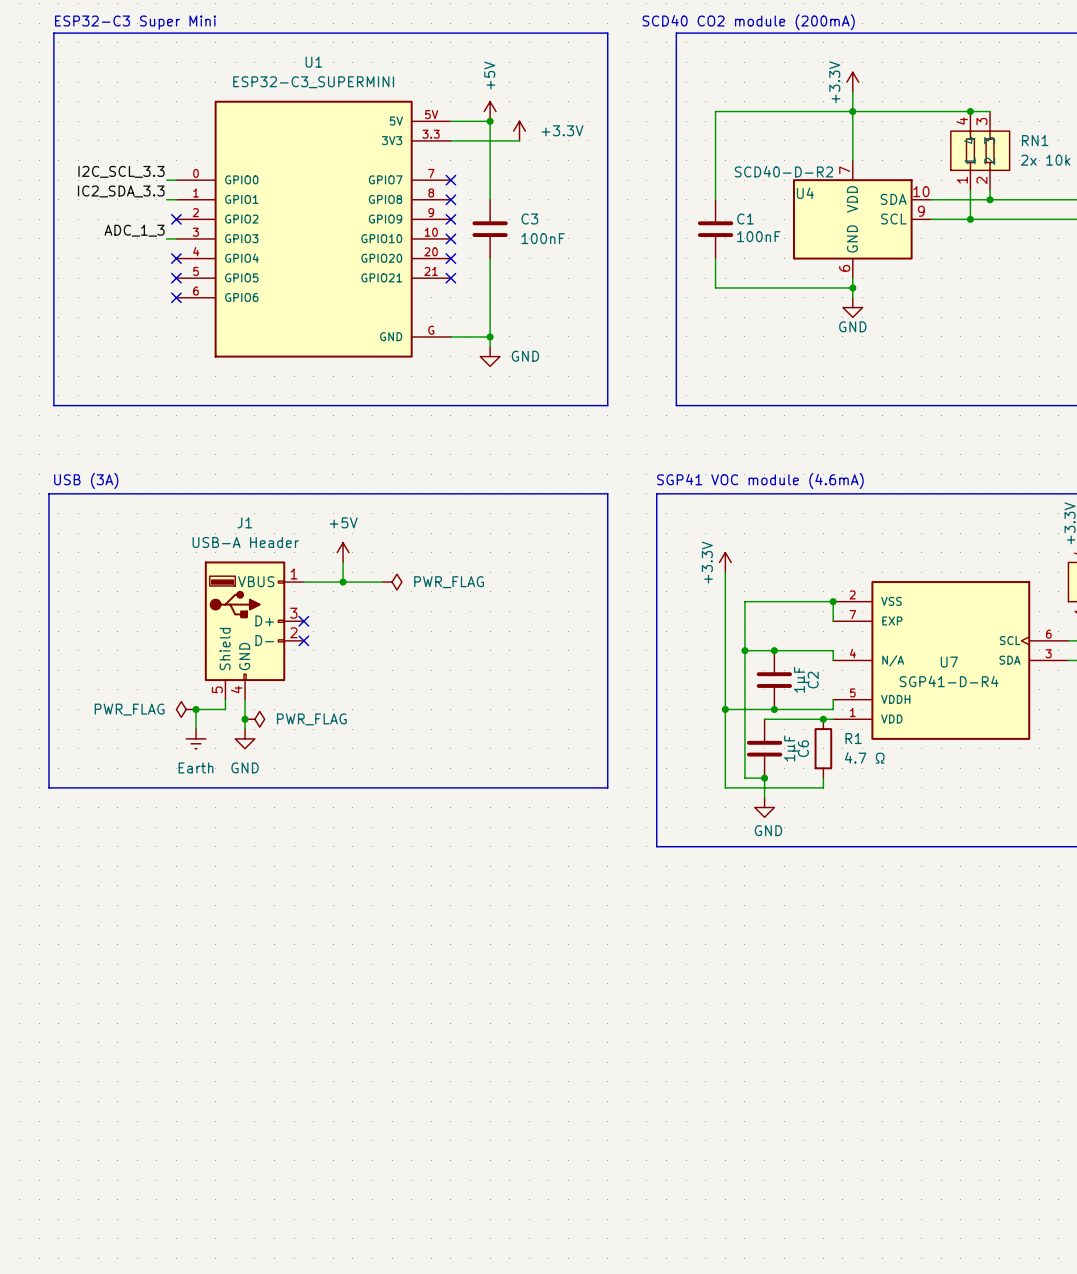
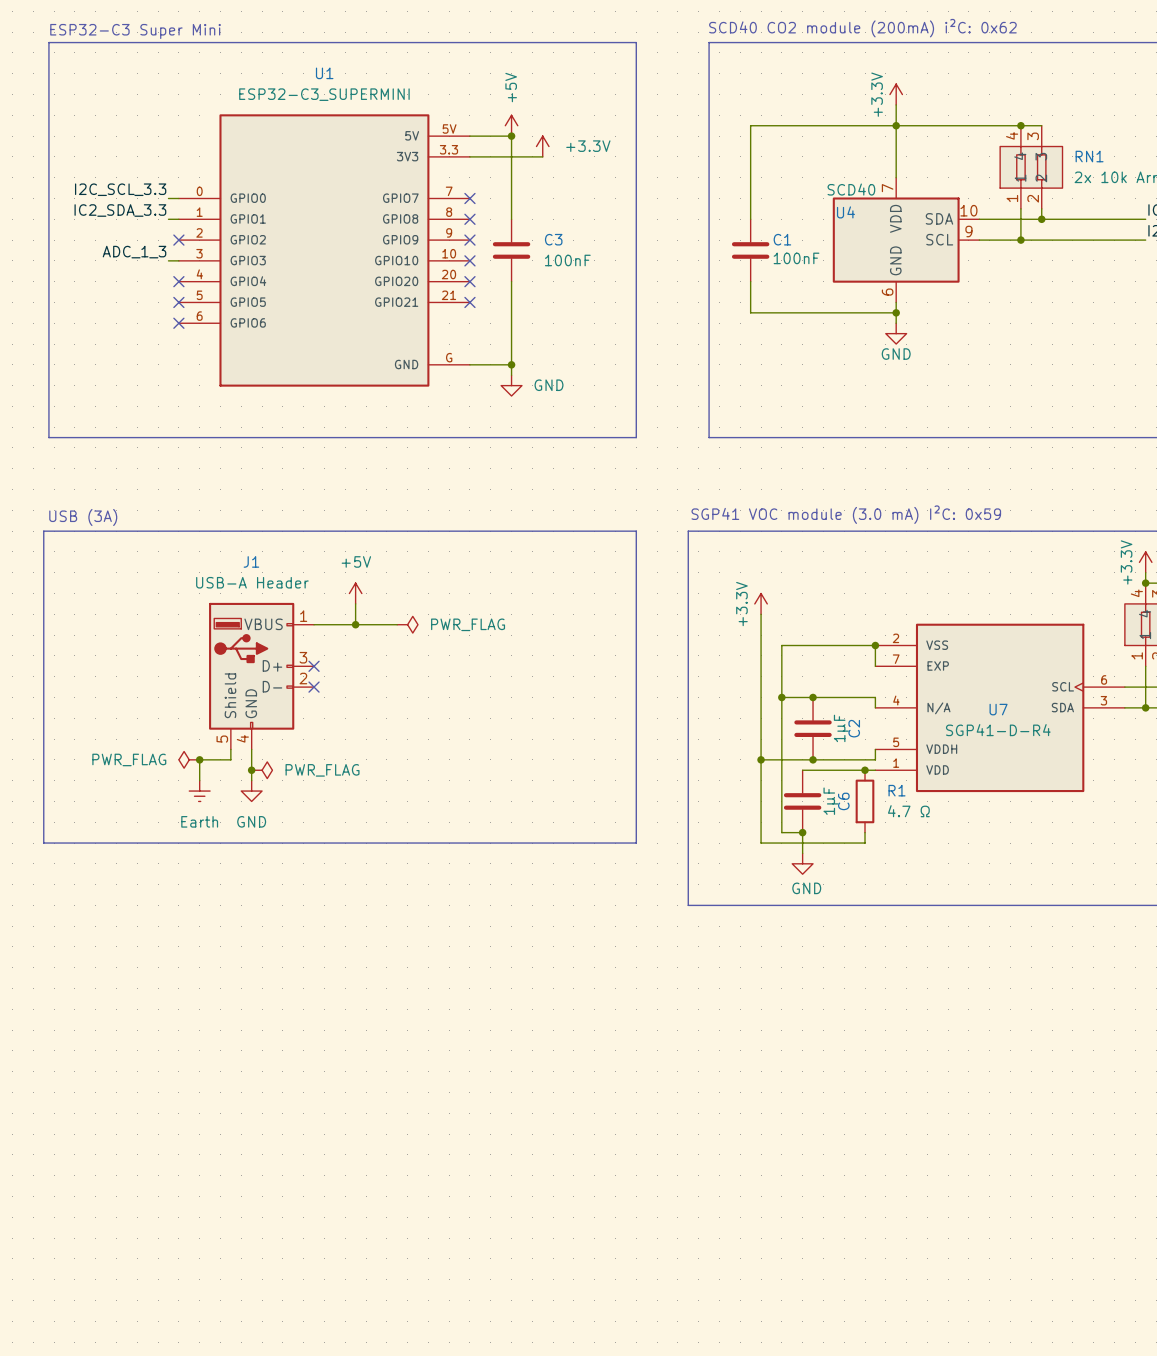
text: SCD40 CO2 module (200mA) (748, 22) -> SCD40 CO2 module (200mA) i²C: 0x62 (862, 28)
U4 value: SCD40-D-R2 (783, 171) -> SCD40 (851, 189)
text: SGP41 VOC module (4.6mA) (760, 480) -> SGP41 VOC module (3.0 mA) I²C: 0x59 (846, 514)

